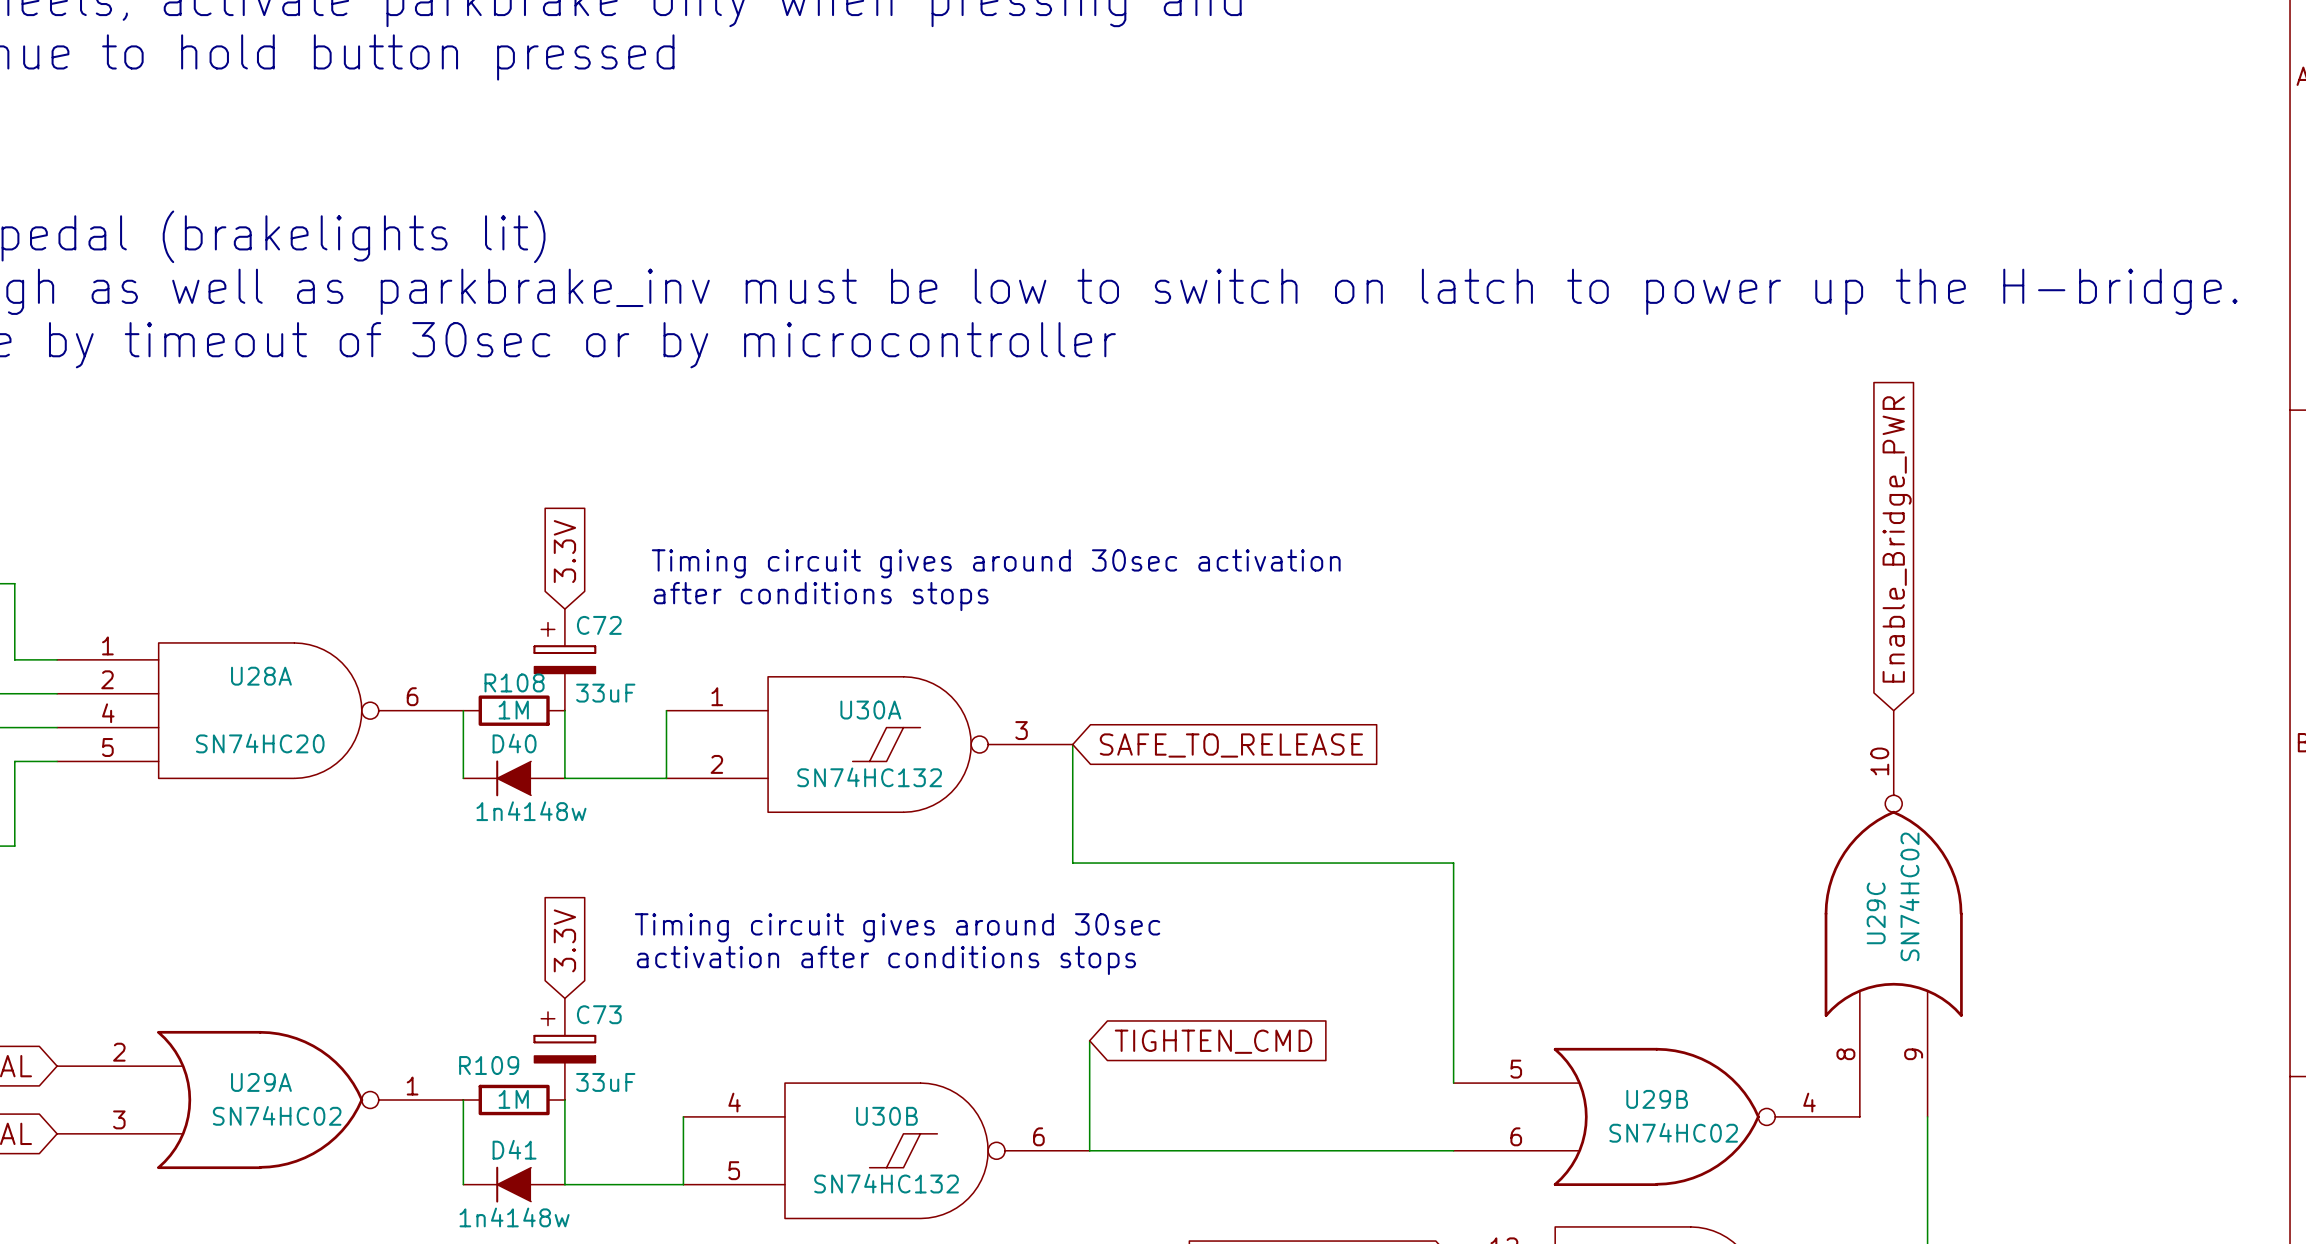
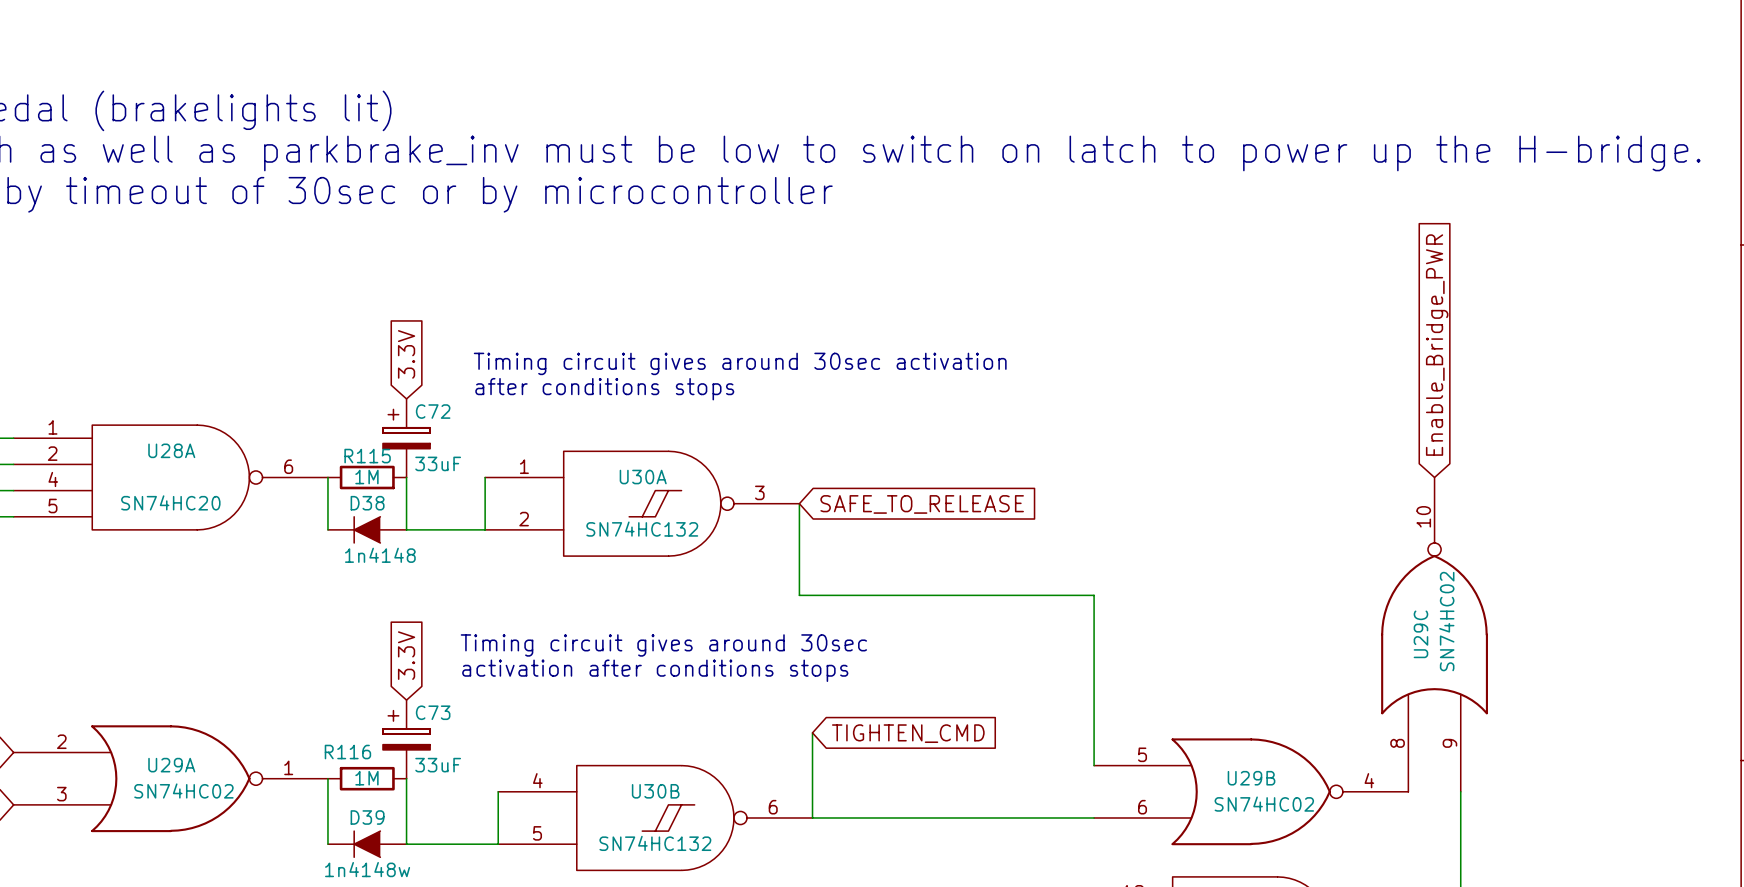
R108 name: R108 (514, 682) -> R115 (367, 456)
D40 name: D40 (514, 743) -> D38 (367, 503)
D40 value: 1n4148w (531, 811) -> 1n4148 (380, 555)
R109 name: R109 (489, 1065) -> R116 (347, 752)
D41 name: D41 (514, 1149) -> D39 (367, 817)

